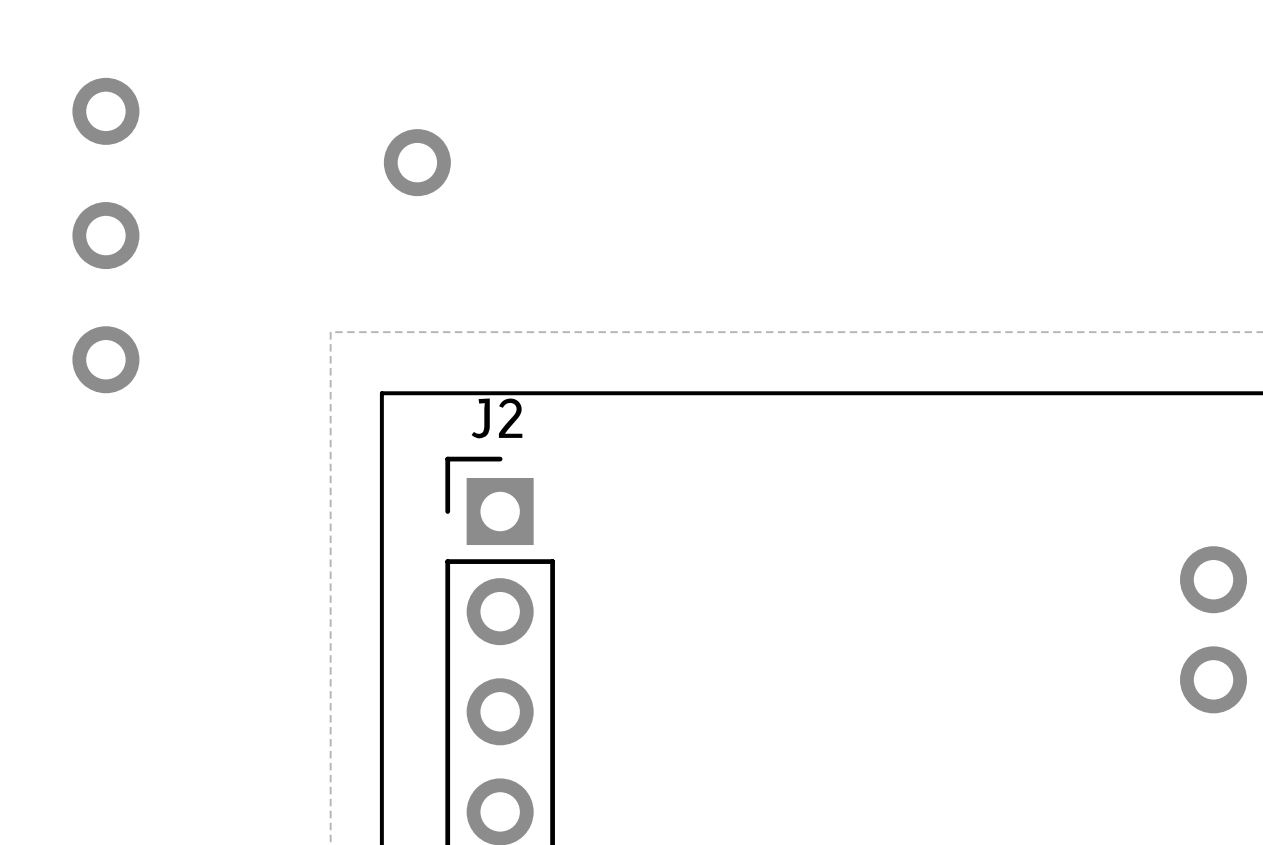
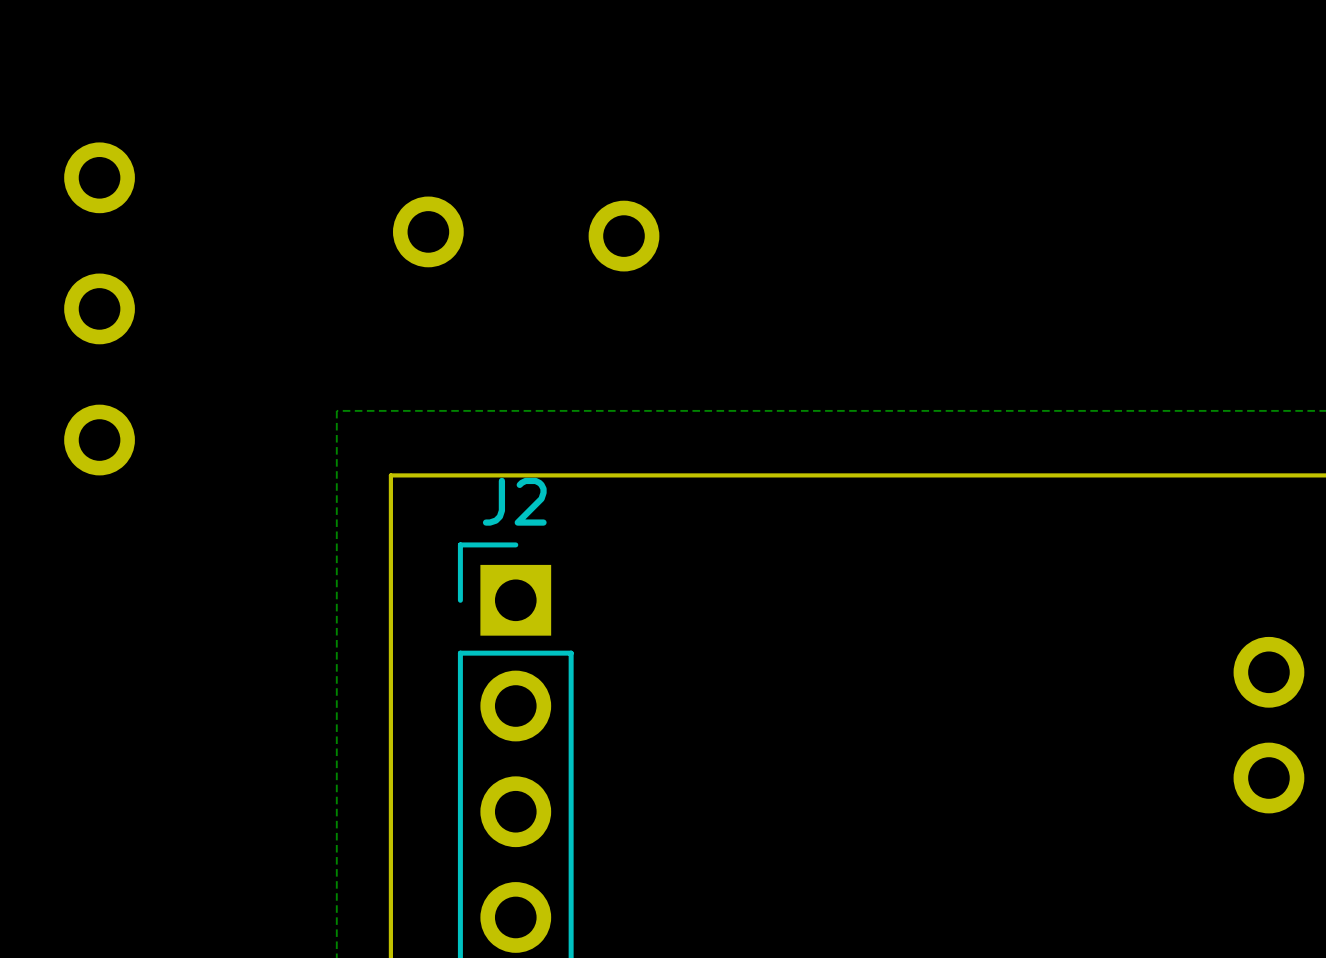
part: none -> (624, 236)

